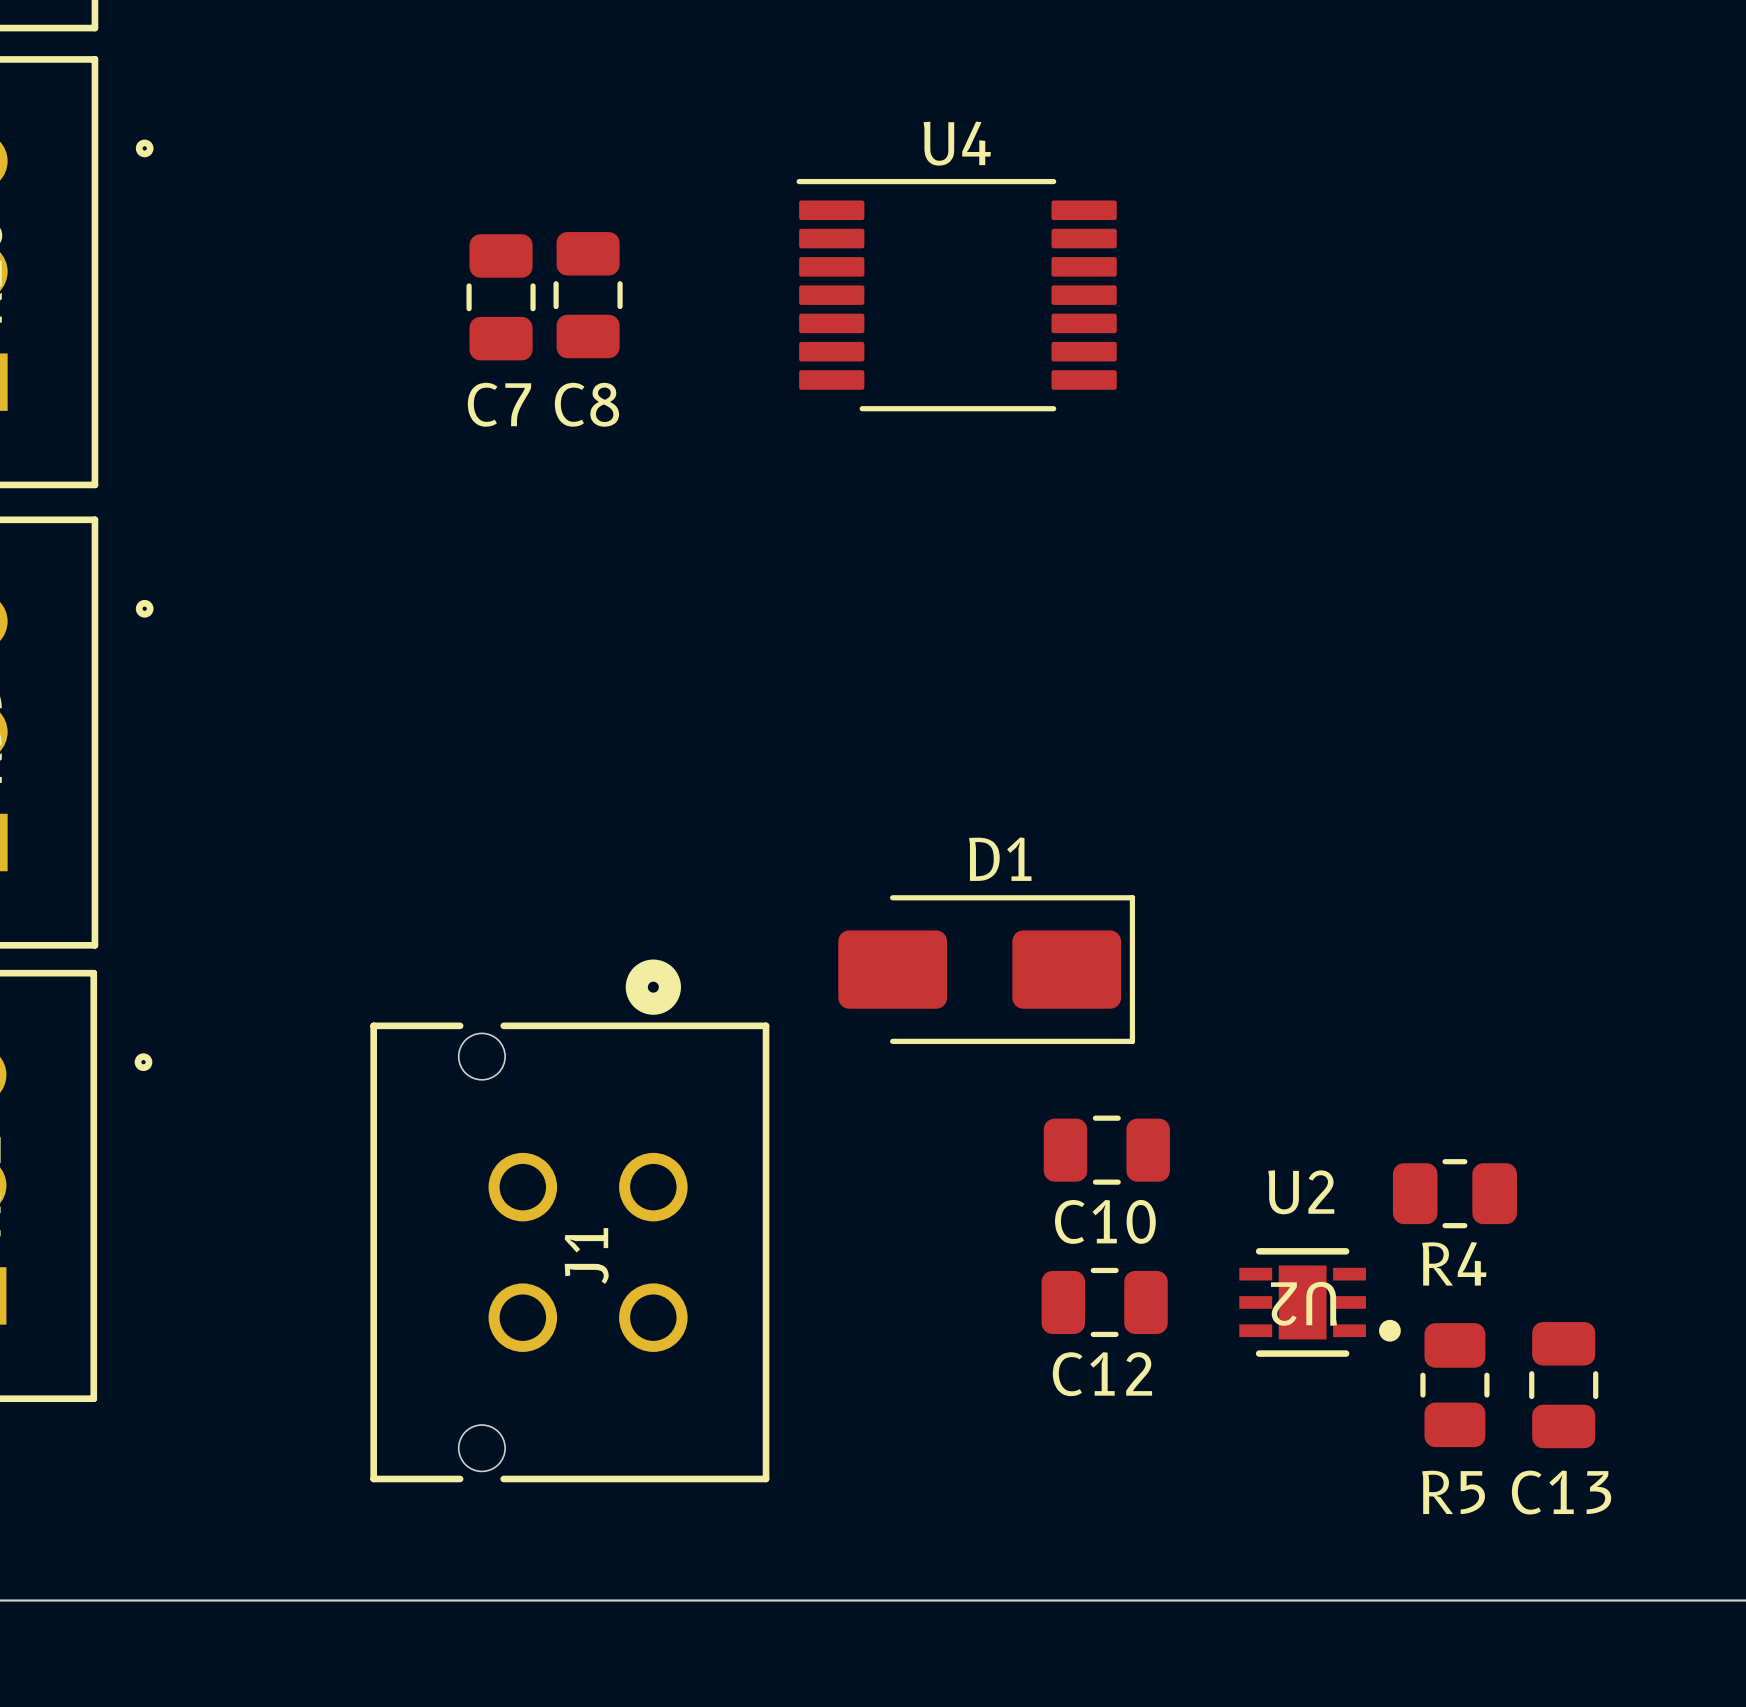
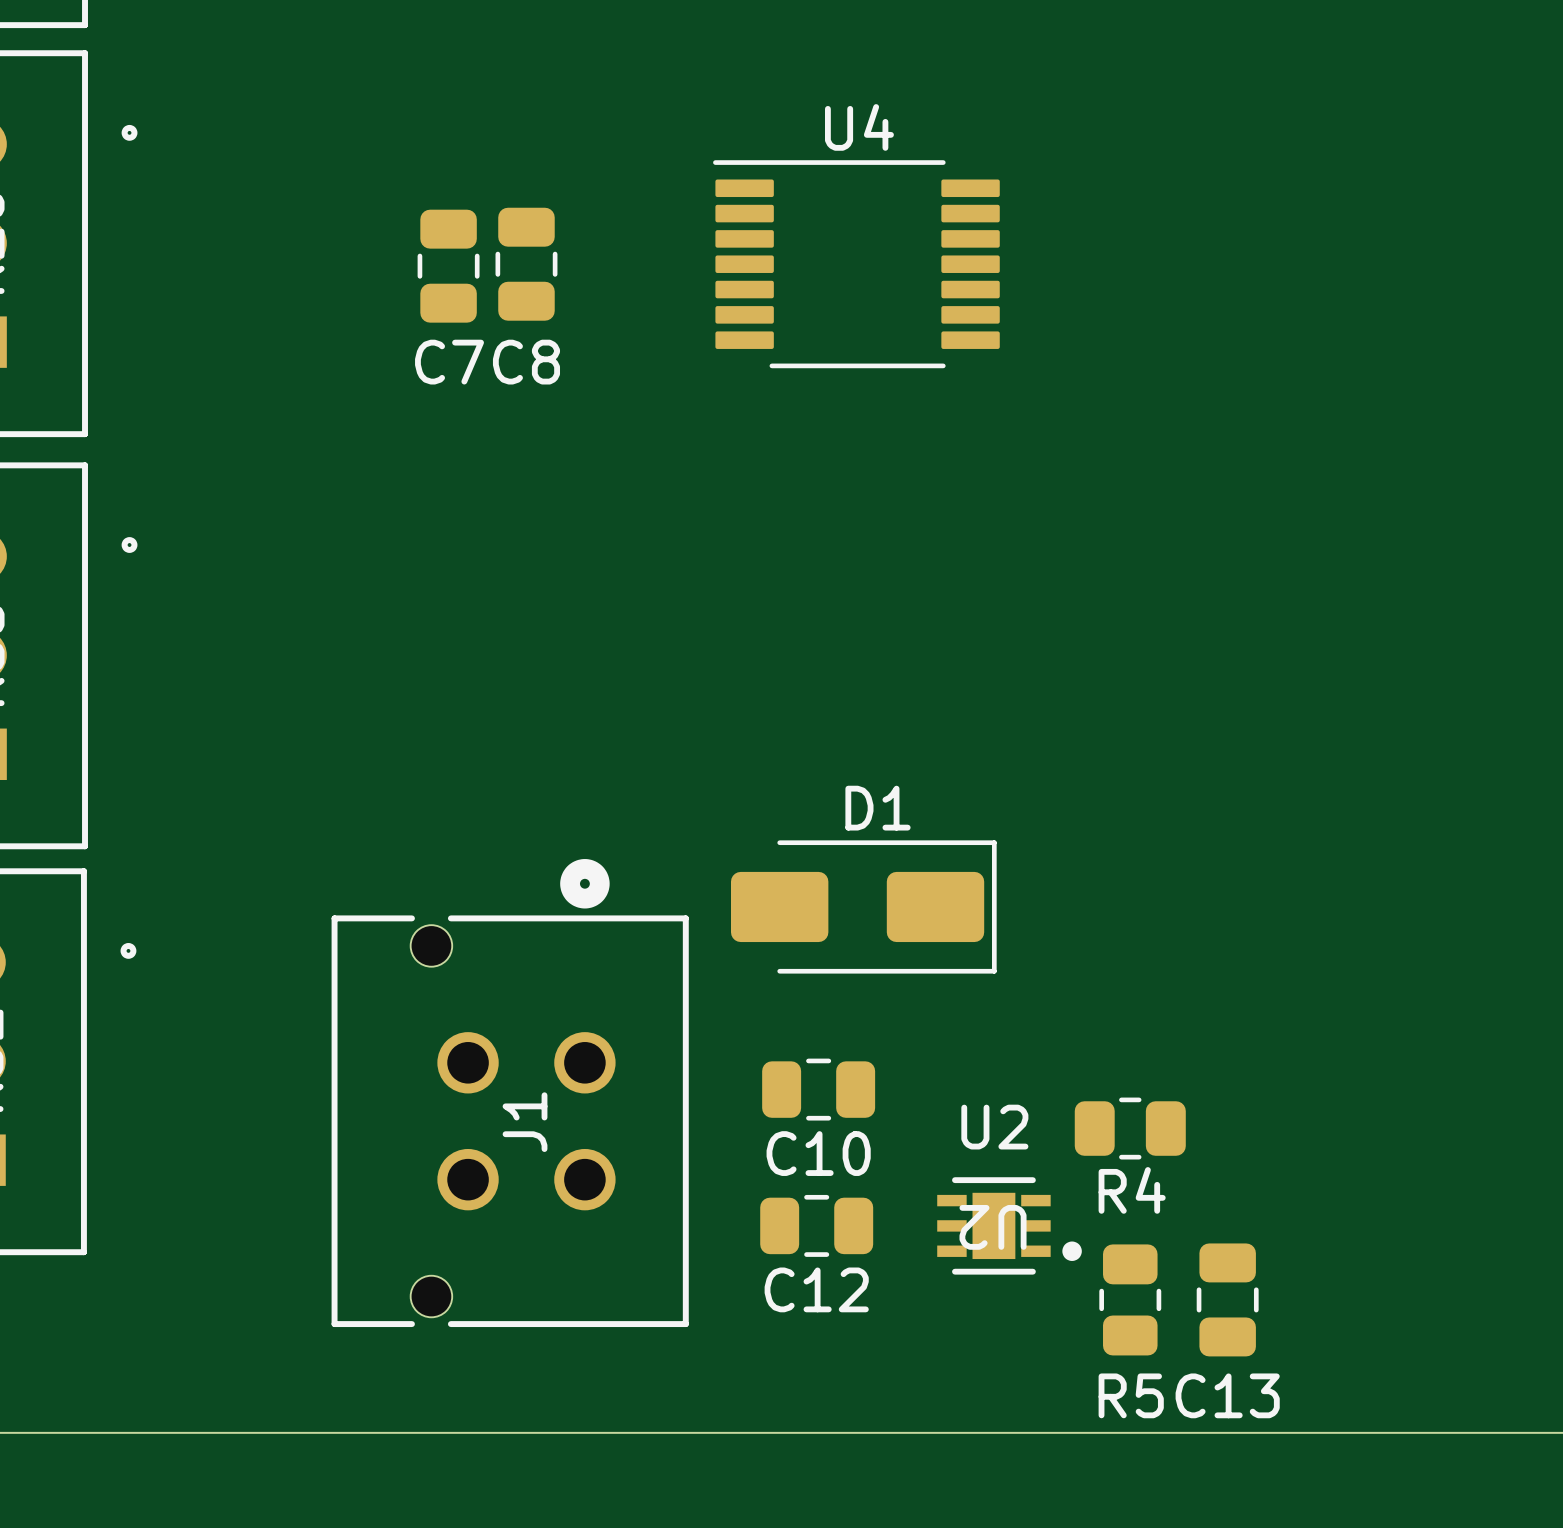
D1 position: (986, 969) -> (863, 906)
C10 position: (1106, 1150) -> (818, 1089)
R4 position: (1454, 1193) -> (1130, 1128)
C12 position: (1104, 1302) -> (816, 1225)
U2 position: (1320, 1302) -> (1009, 1225)
R5 position: (1454, 1385) -> (1130, 1299)
C13 position: (1563, 1385) -> (1227, 1299)

